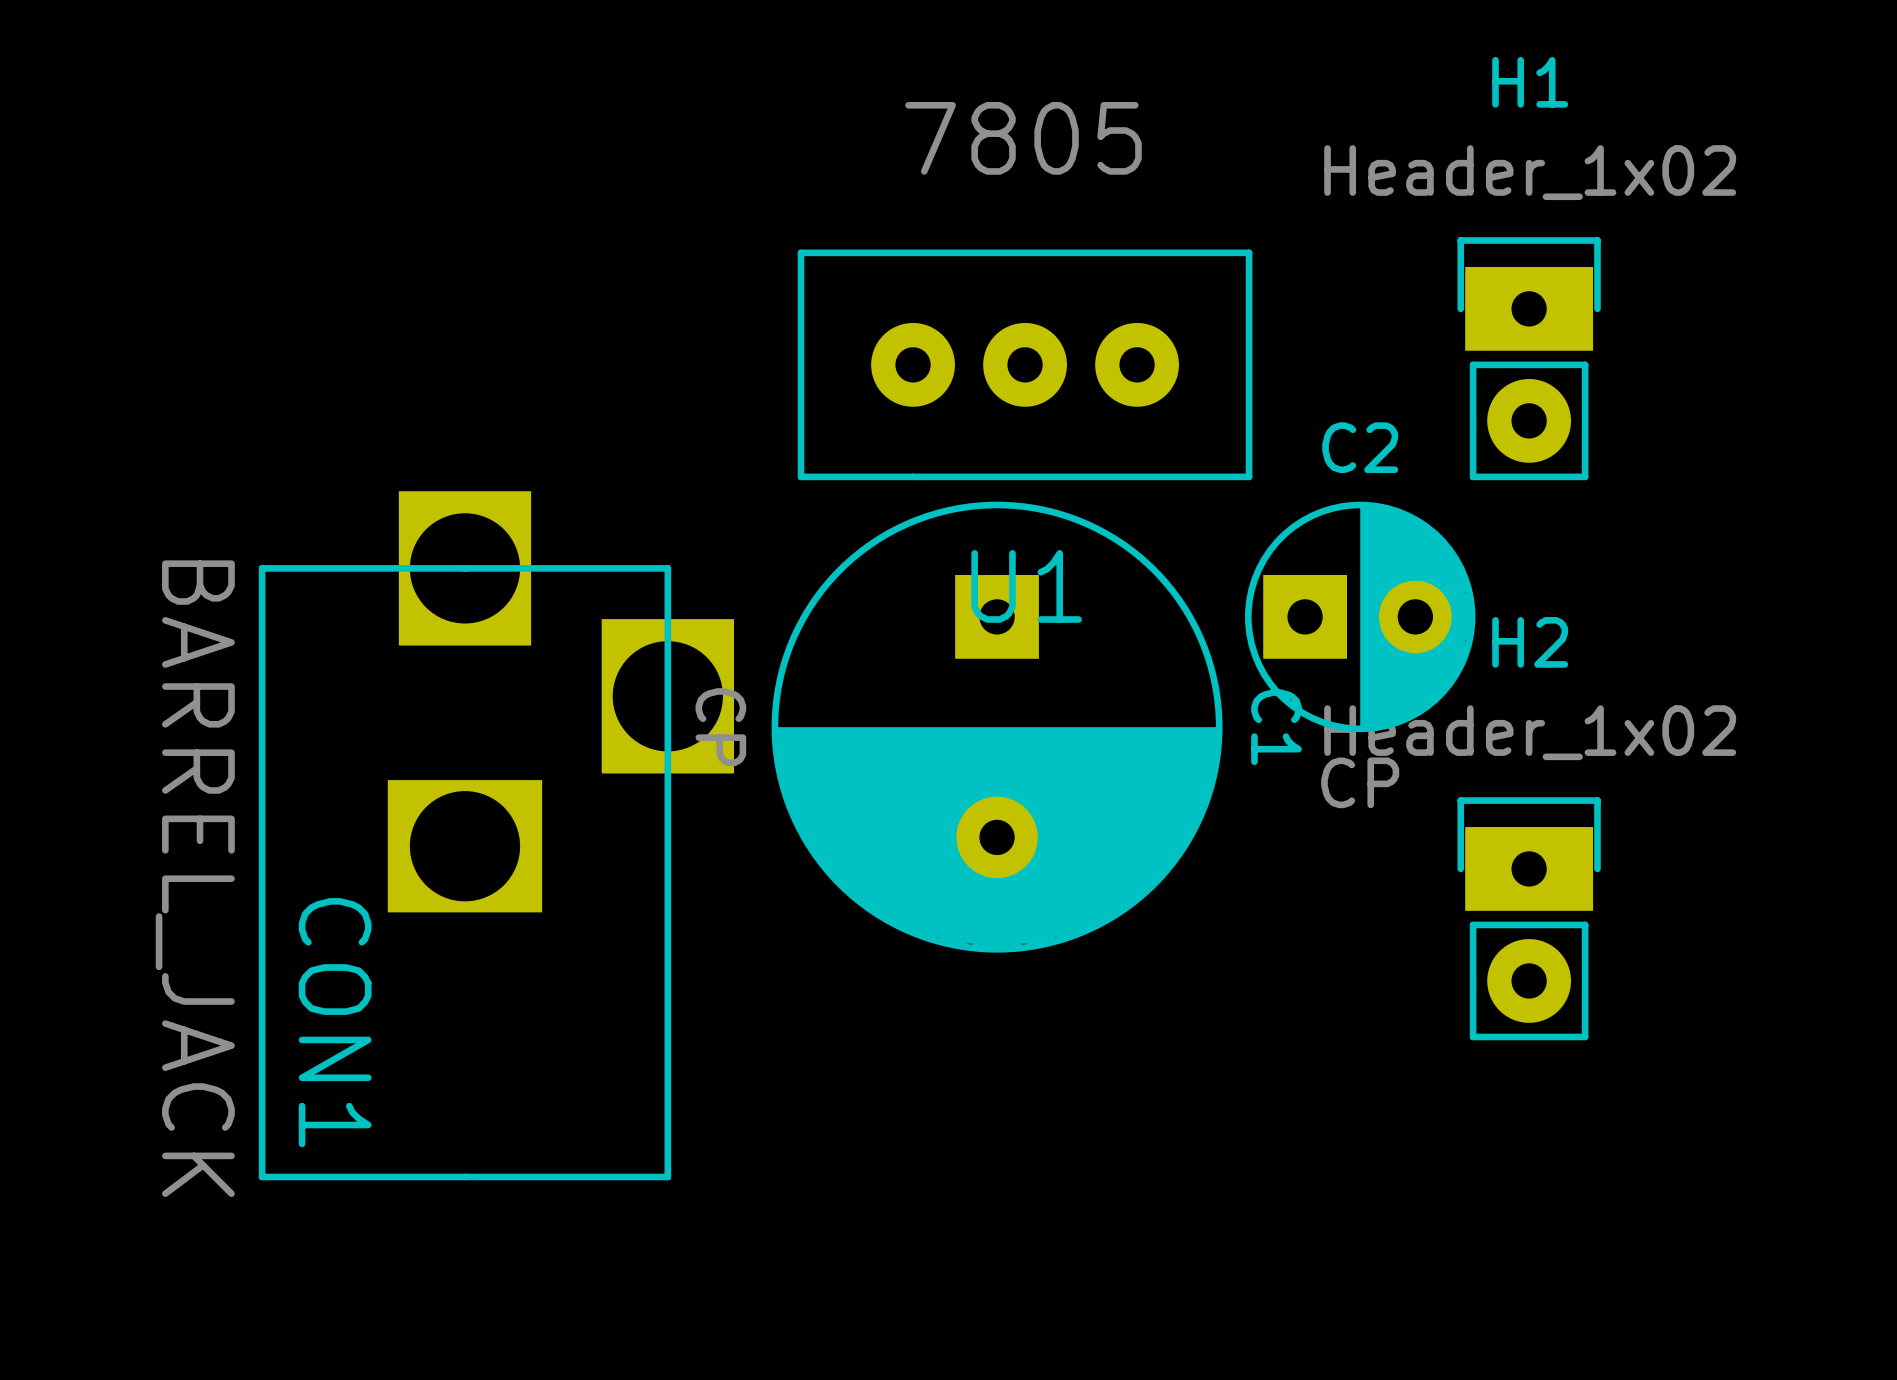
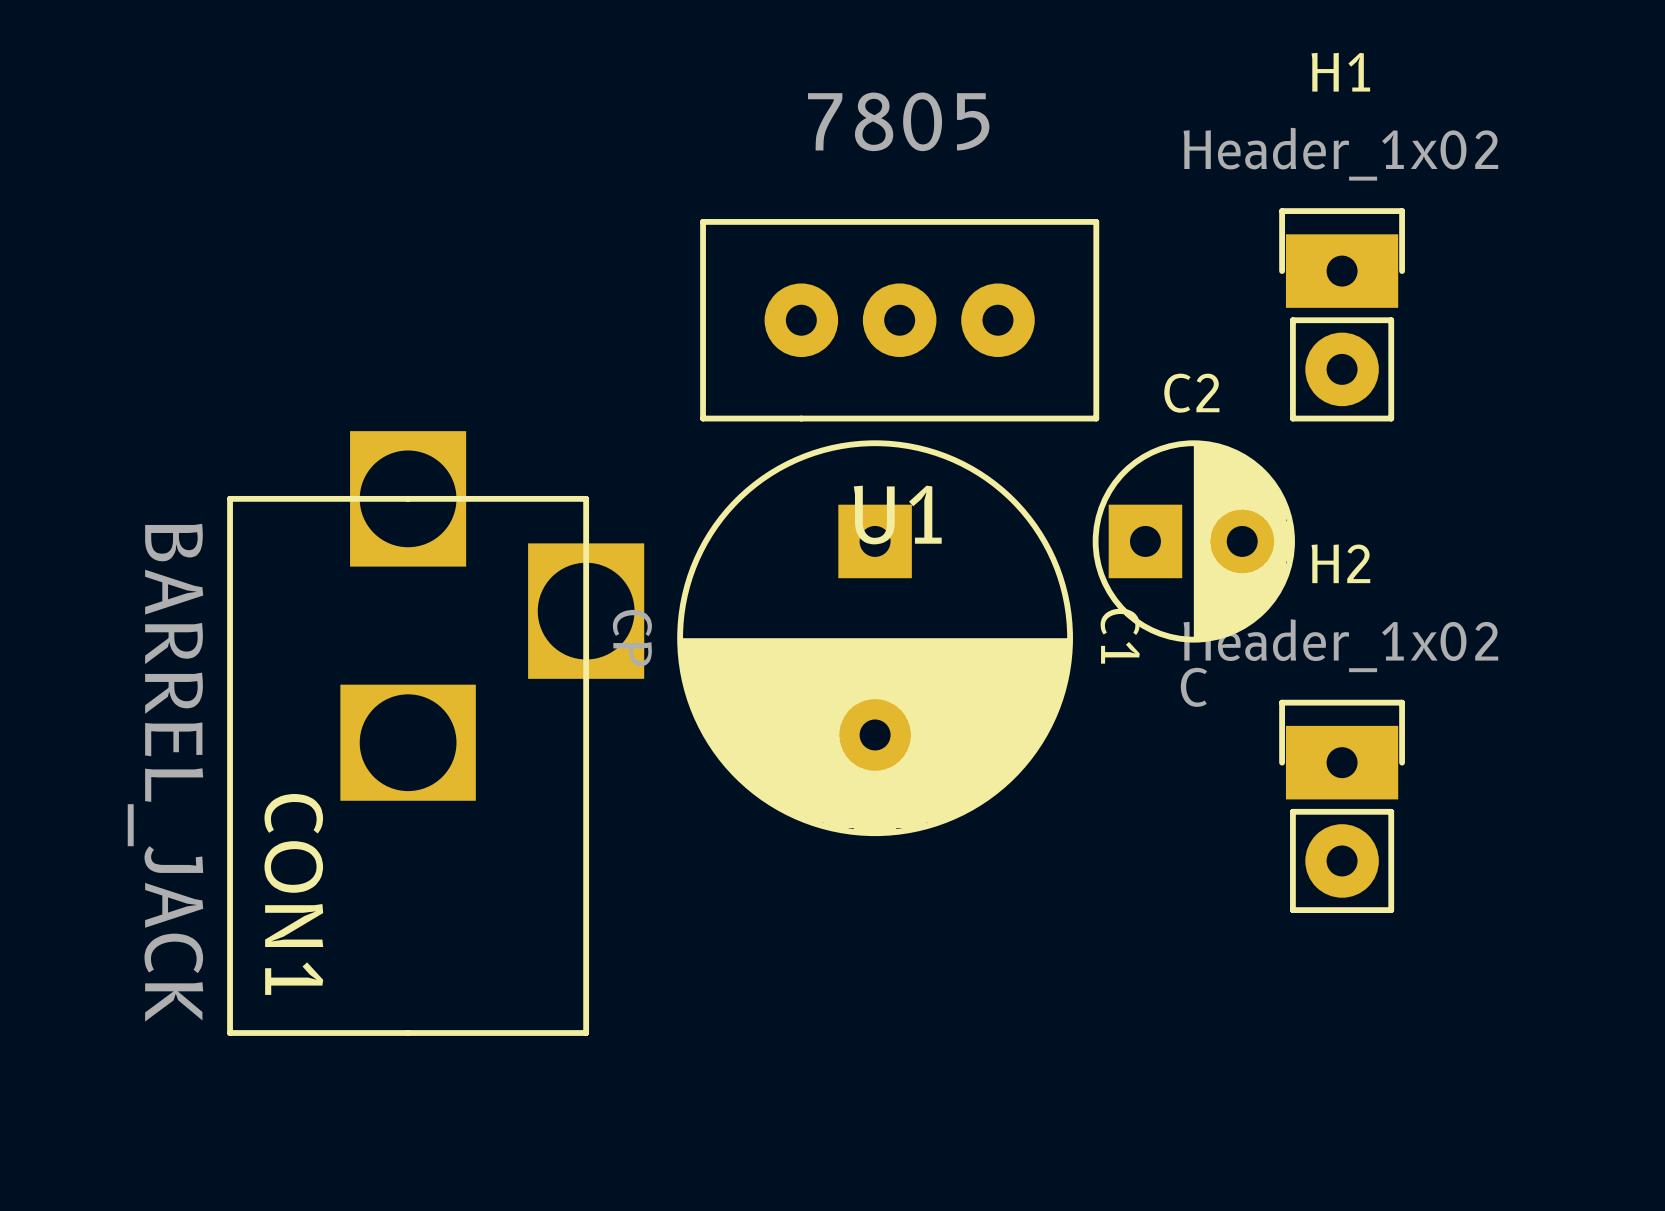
C2 value: CP (1360, 782) -> C (1193, 687)

